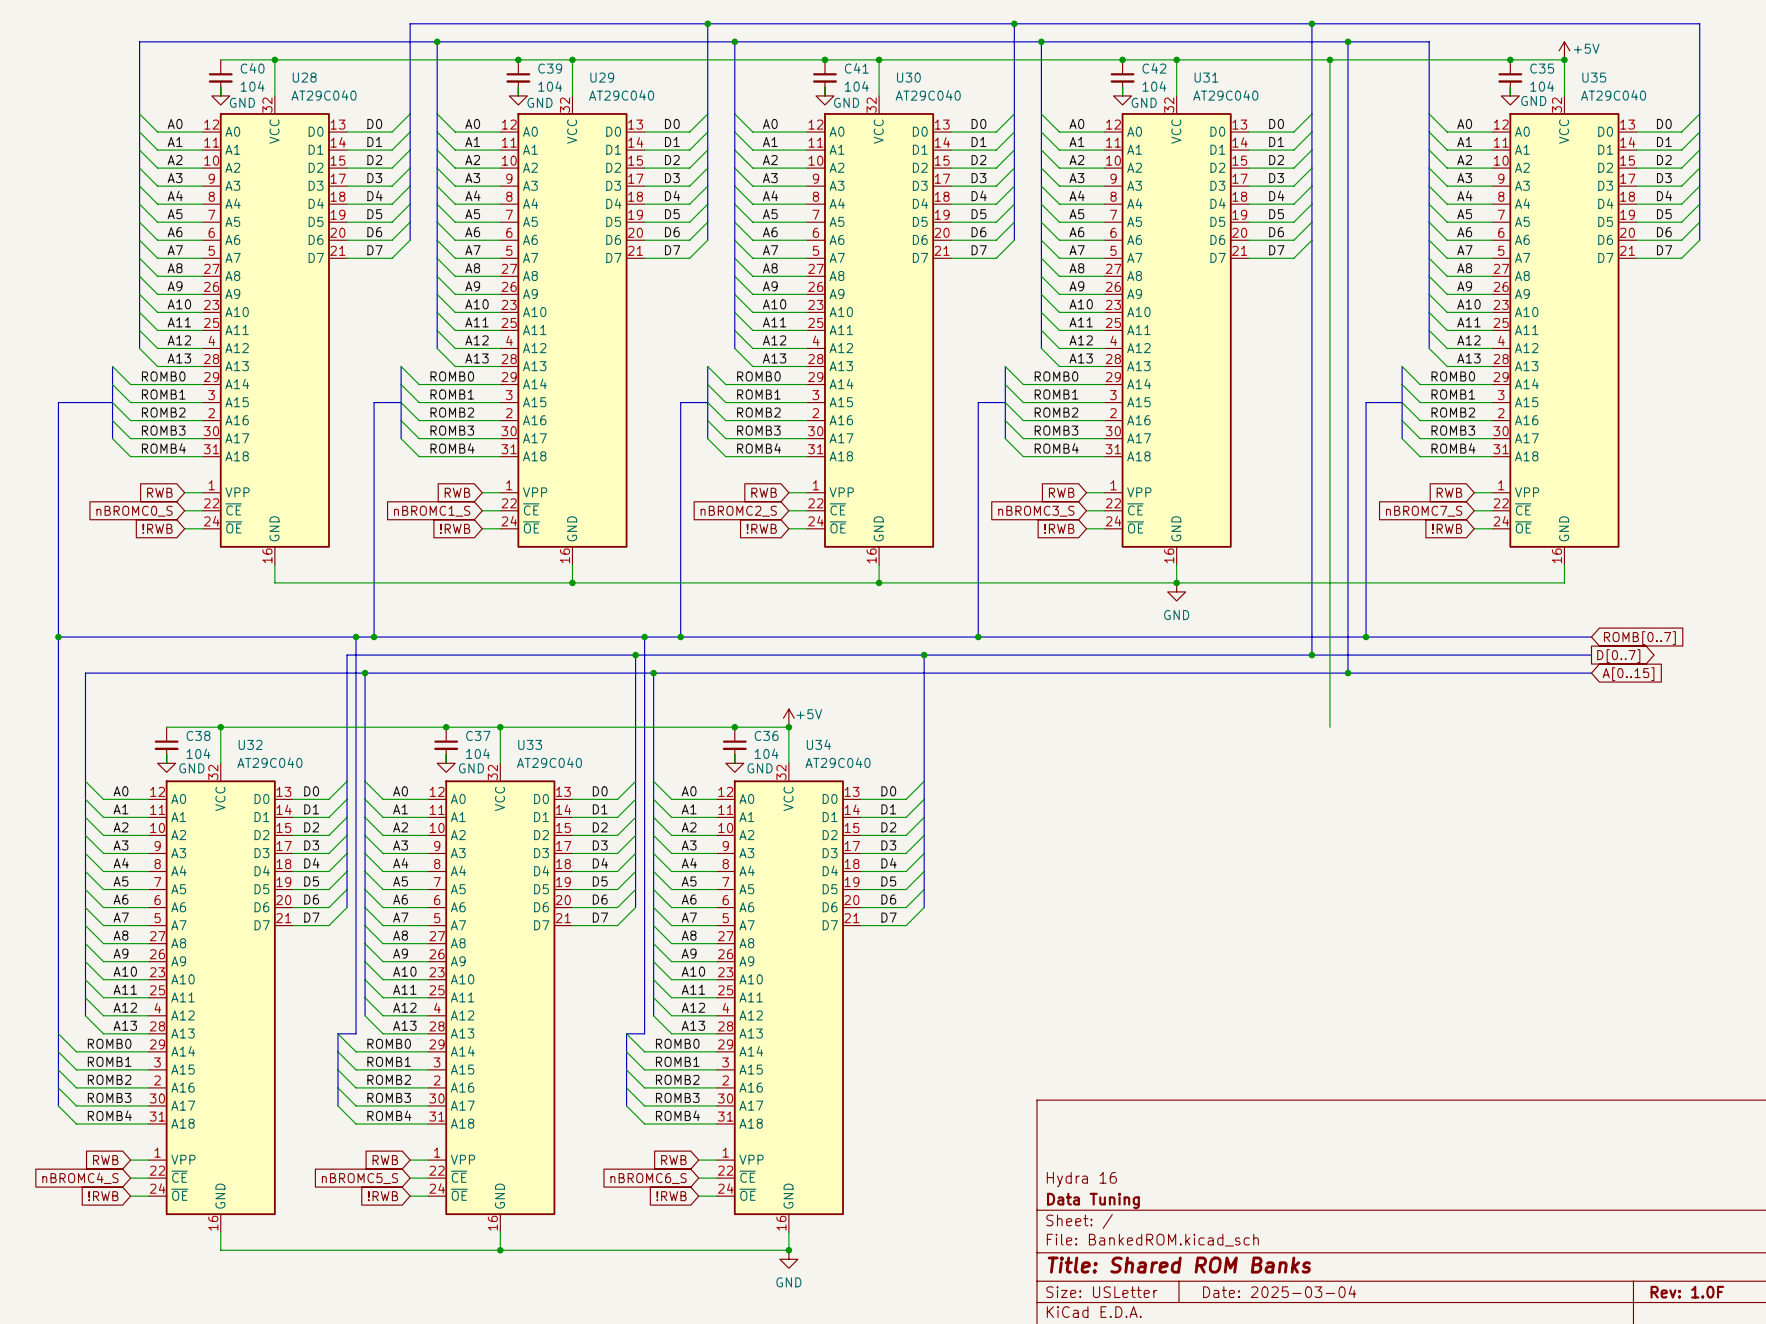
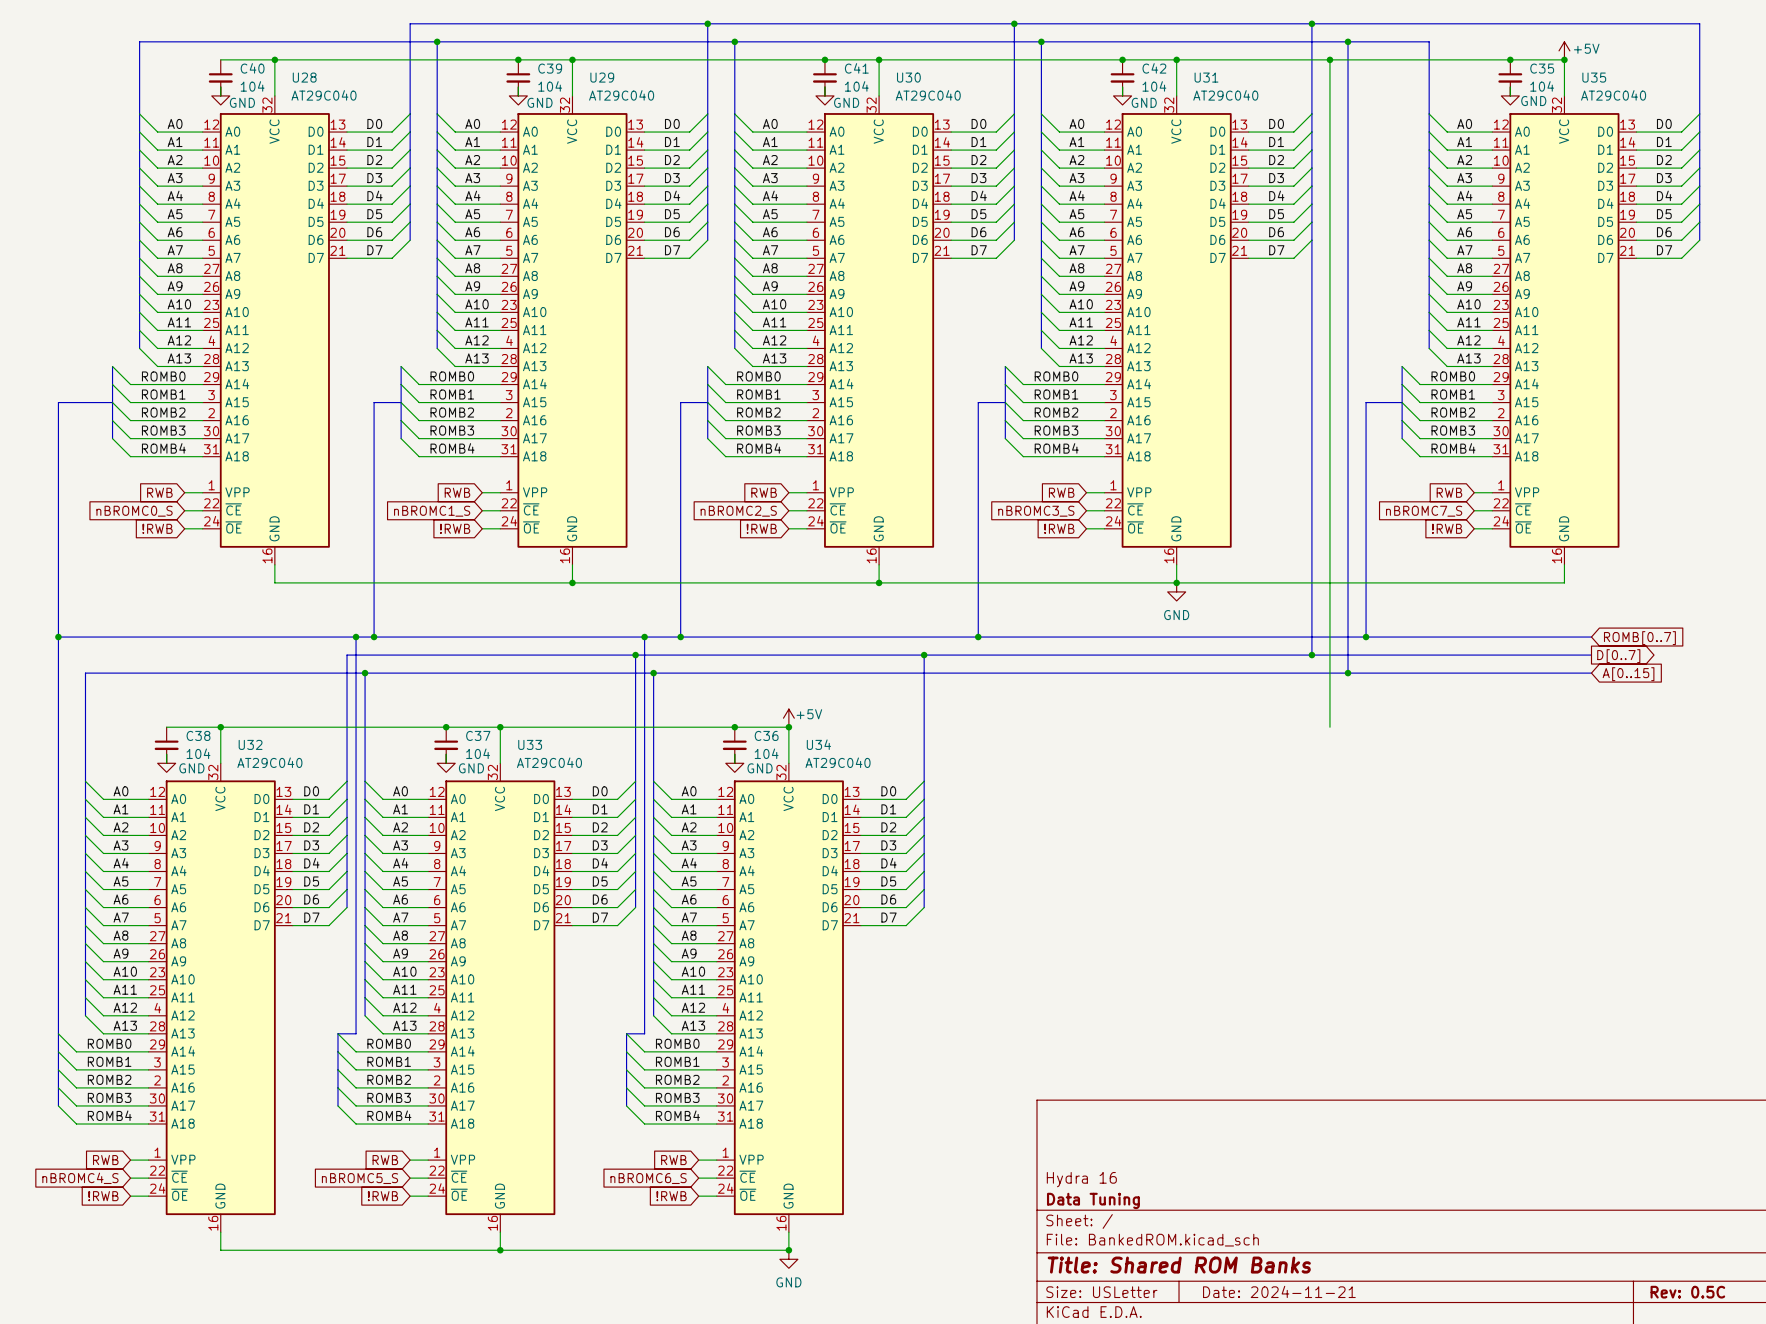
title block: Date: 2025-03-04 (1279, 1291) -> Date: 2024-11-21 (1279, 1291)
title block: Rev: 1.0F (1687, 1292) -> Rev: 0.5C (1687, 1292)

